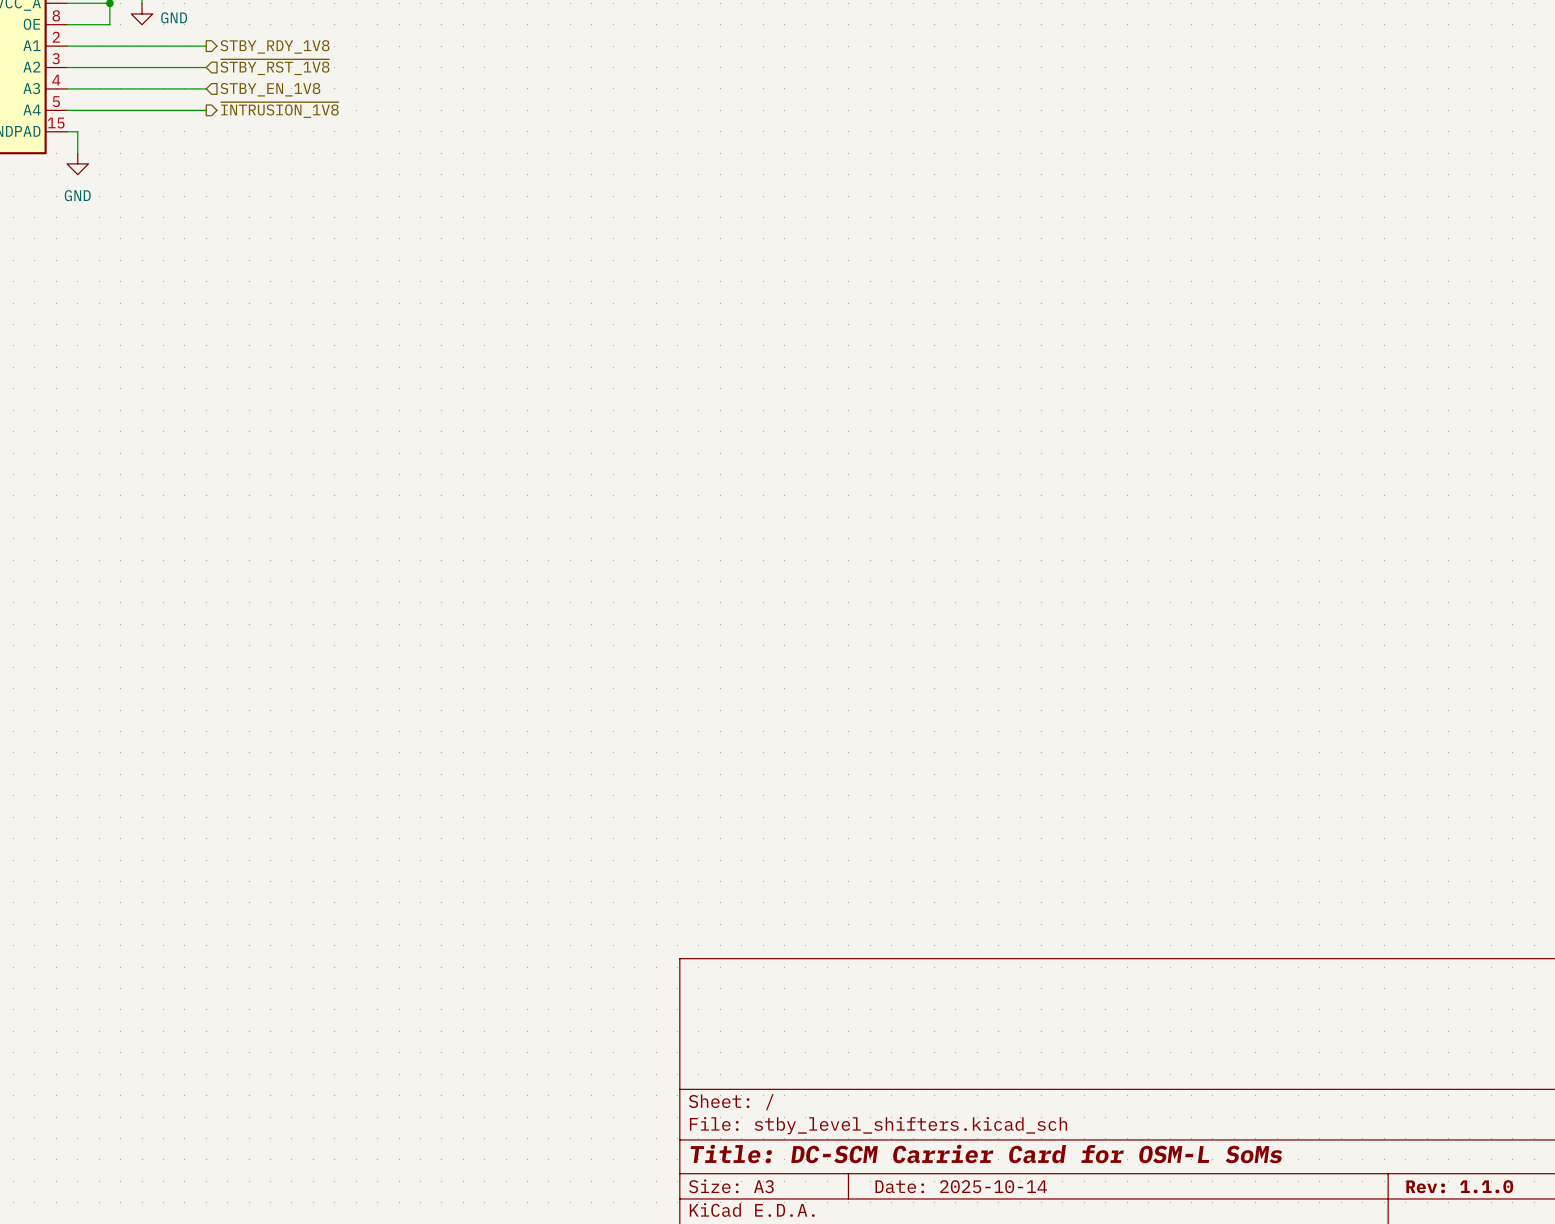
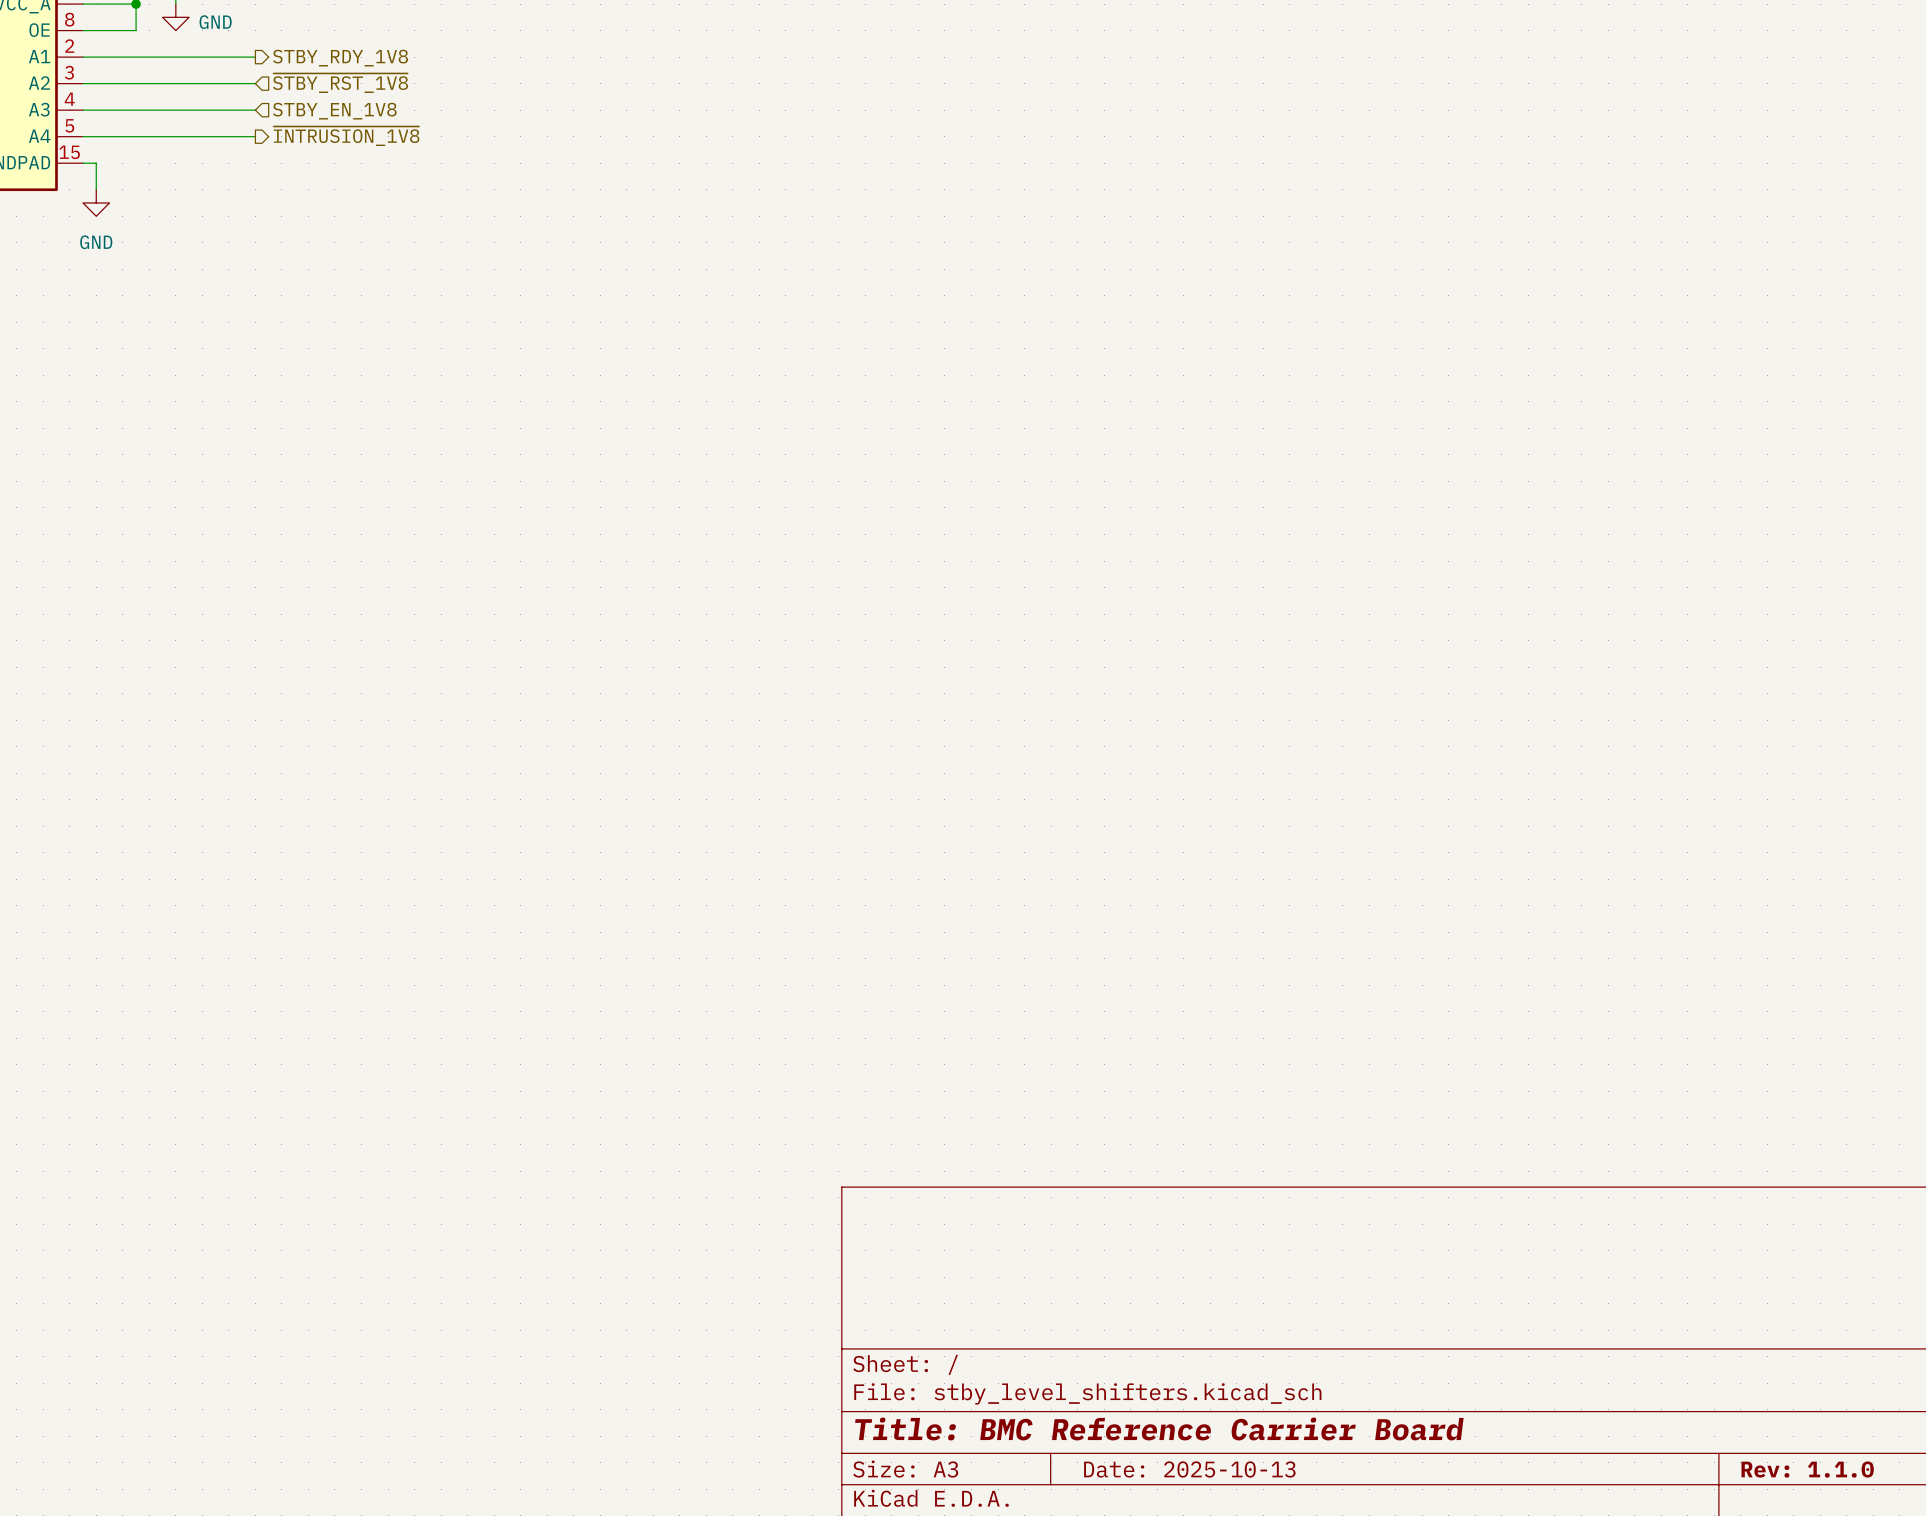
title block: Title: DC-SCM Carrier Card for OSM-L SoMs (986, 1154) -> Title: BMC Reference Carrier Board (1159, 1429)
title block: Date: 2025-10-14 (961, 1186) -> Date: 2025-10-13 (1189, 1469)

